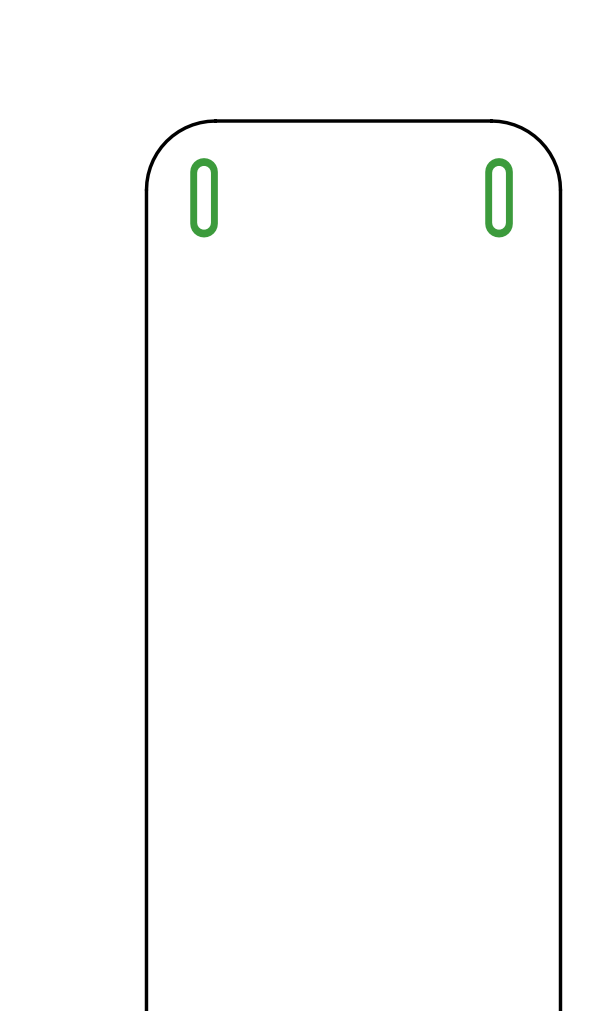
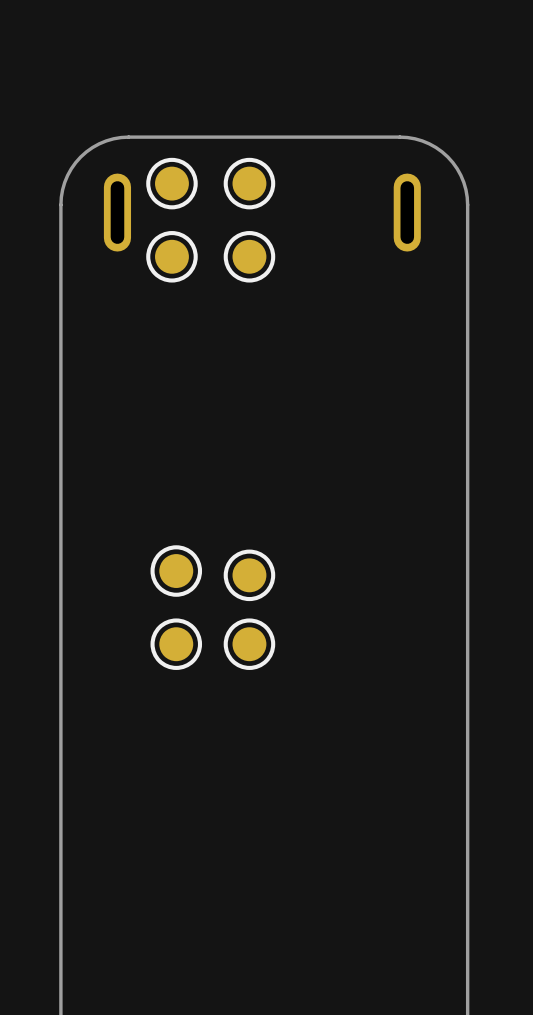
part: none -> (171, 183)
part: none -> (249, 183)
part: none -> (171, 256)
part: none -> (249, 256)
part: none -> (176, 571)
part: none -> (249, 575)
part: none -> (176, 644)
part: none -> (249, 644)

